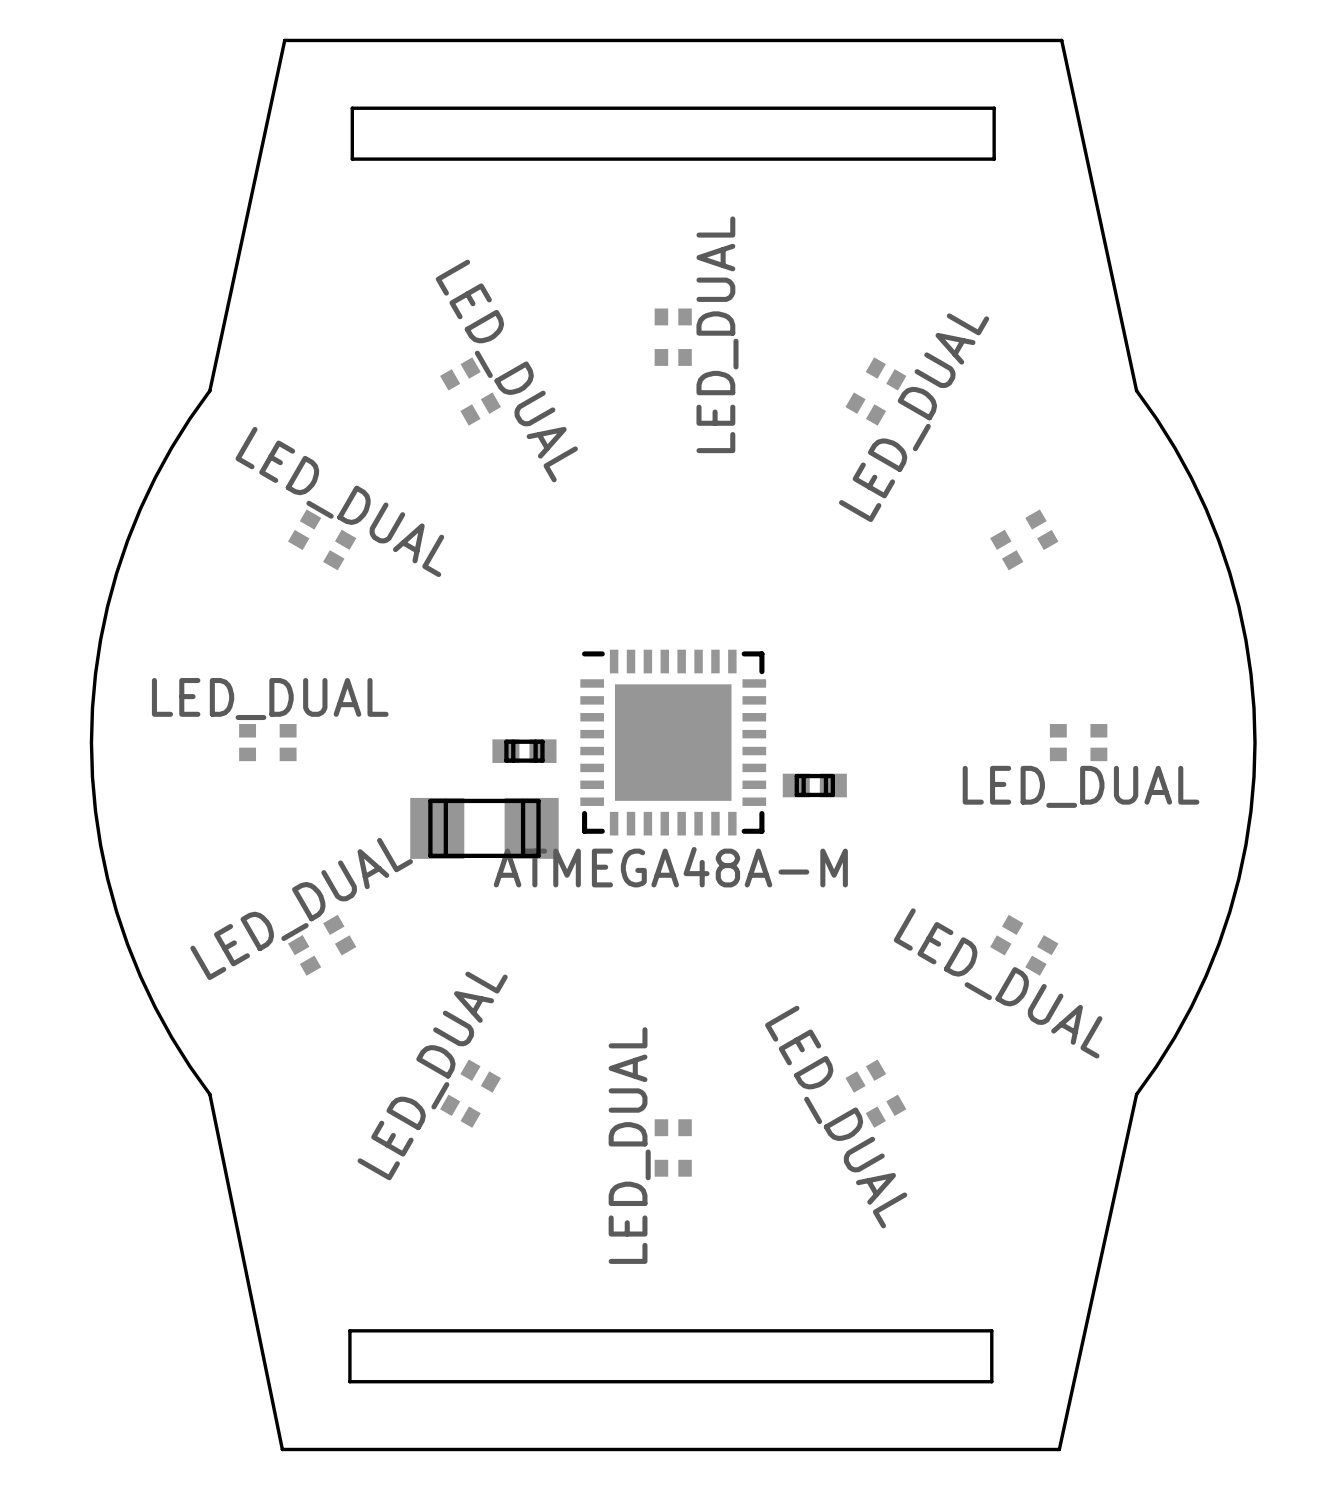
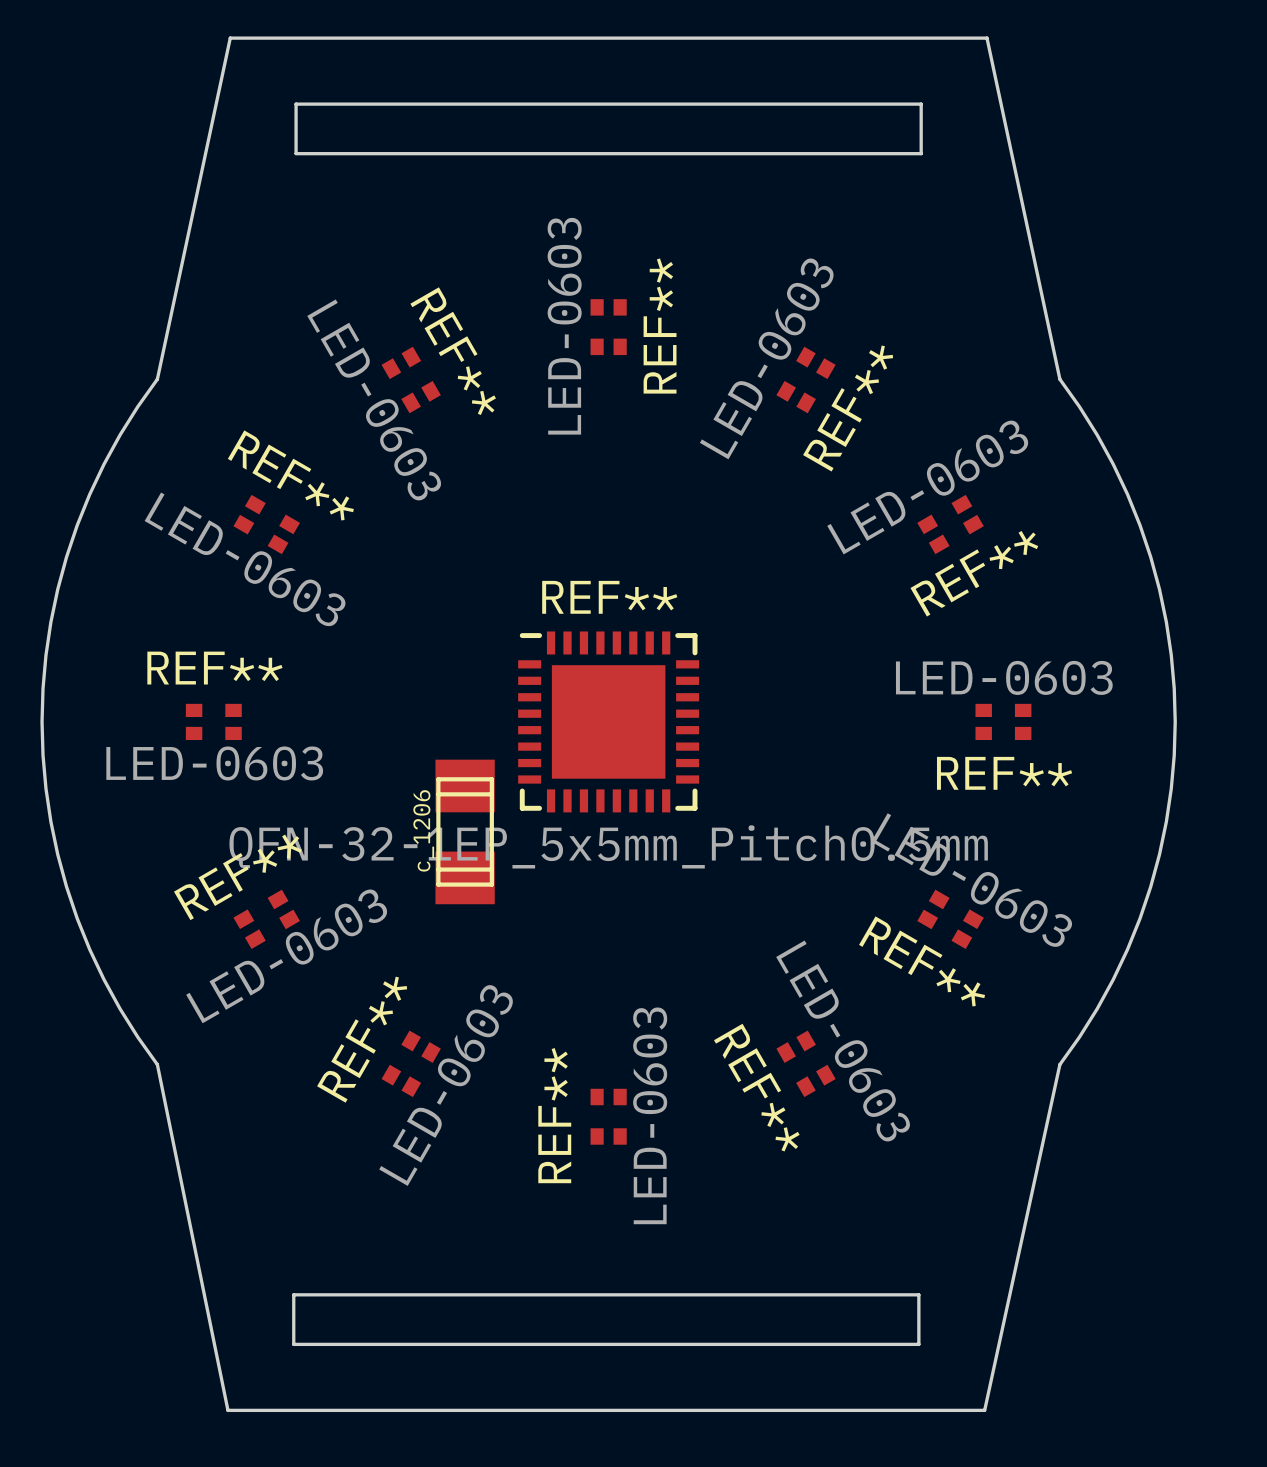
REF** value: LED_DUAL (717, 334) -> LED-0603 (564, 326)
REF** name: none -> REF** (660, 326)
REF** name: none -> REF** (453, 351)
REF** value: LED_DUAL (506, 371) -> LED-0603 (374, 400)
REF** name: none -> REF** (848, 408)
REF** value: LED_DUAL (914, 417) -> LED-0603 (766, 358)
REF** name: none -> REF** (290, 475)
REF** value: none -> LED-0603 (927, 487)
REF** value: LED_DUAL (339, 501) -> LED-0603 (245, 559)
REF** name: none -> REF** (974, 573)
REF** name: none -> REF** (609, 597)
REF** name: none -> REF** (214, 668)
REF** value: LED_DUAL (270, 699) -> LED-0603 (214, 763)
part: (524, 751) -> none
part: (814, 785) -> none
REF** value: LED_DUAL (1081, 786) -> LED-0603 (1004, 677)
REF** name: none -> REF** (1004, 773)
part: (484, 828) -> none
c_1206: none -> (465, 831)
REF** value: ATMEGA48A-M (670, 867) -> QFN-32-1EP_5x5mm_Pitch0.5mm (608, 846)
REF** name: none -> REF** (237, 877)
REF** value: LED_DUAL (301, 908) -> LED-0603 (286, 956)
REF** name: none -> REF** (922, 961)
REF** value: LED_DUAL (998, 983) -> LED-0603 (971, 880)
REF** name: none -> REF** (362, 1039)
REF** value: LED_DUAL (432, 1075) -> LED-0603 (446, 1085)
REF** name: none -> REF** (756, 1087)
REF** value: LED_DUAL (836, 1117) -> LED-0603 (843, 1041)
REF** value: LED_DUAL (629, 1145) -> LED-0603 (650, 1115)
REF** name: none -> REF** (554, 1115)

